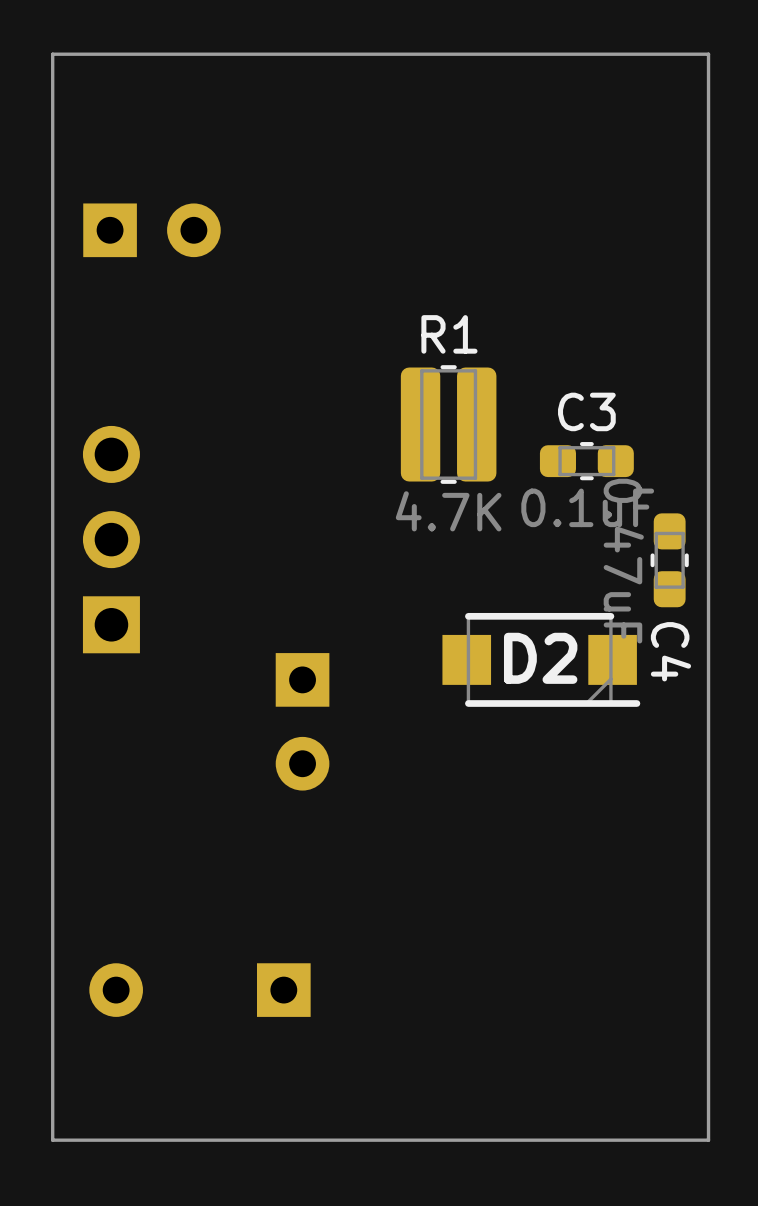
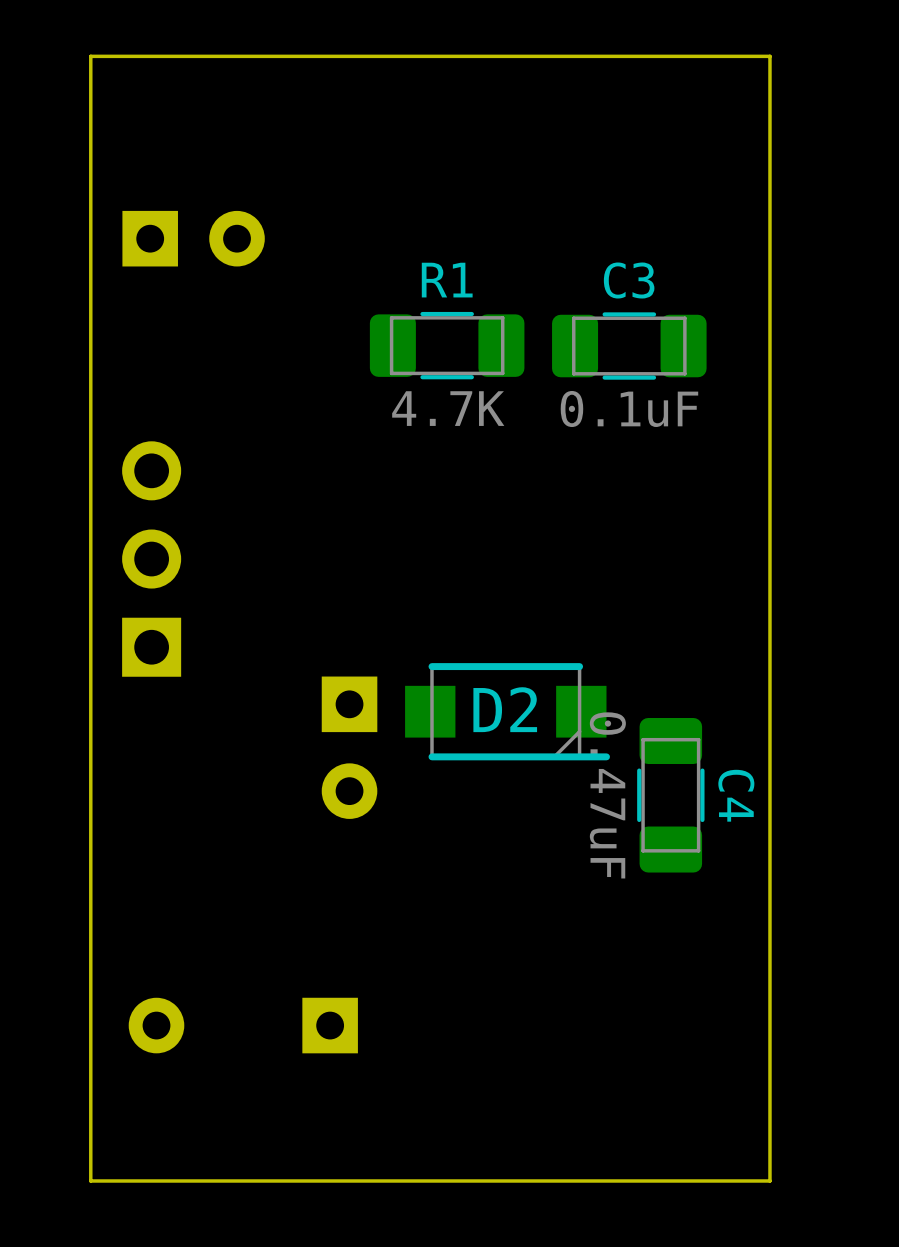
R1 footprint: [400, 365, 497, 484] -> [369, 311, 525, 380]
C3 footprint: [539, 442, 634, 481] -> [552, 312, 707, 380]
C4 footprint: [650, 513, 689, 608] -> [637, 717, 705, 873]
C4 name position: C4 (670, 651) -> C4 (736, 795)
D2 position: (541, 659) -> (507, 711)

